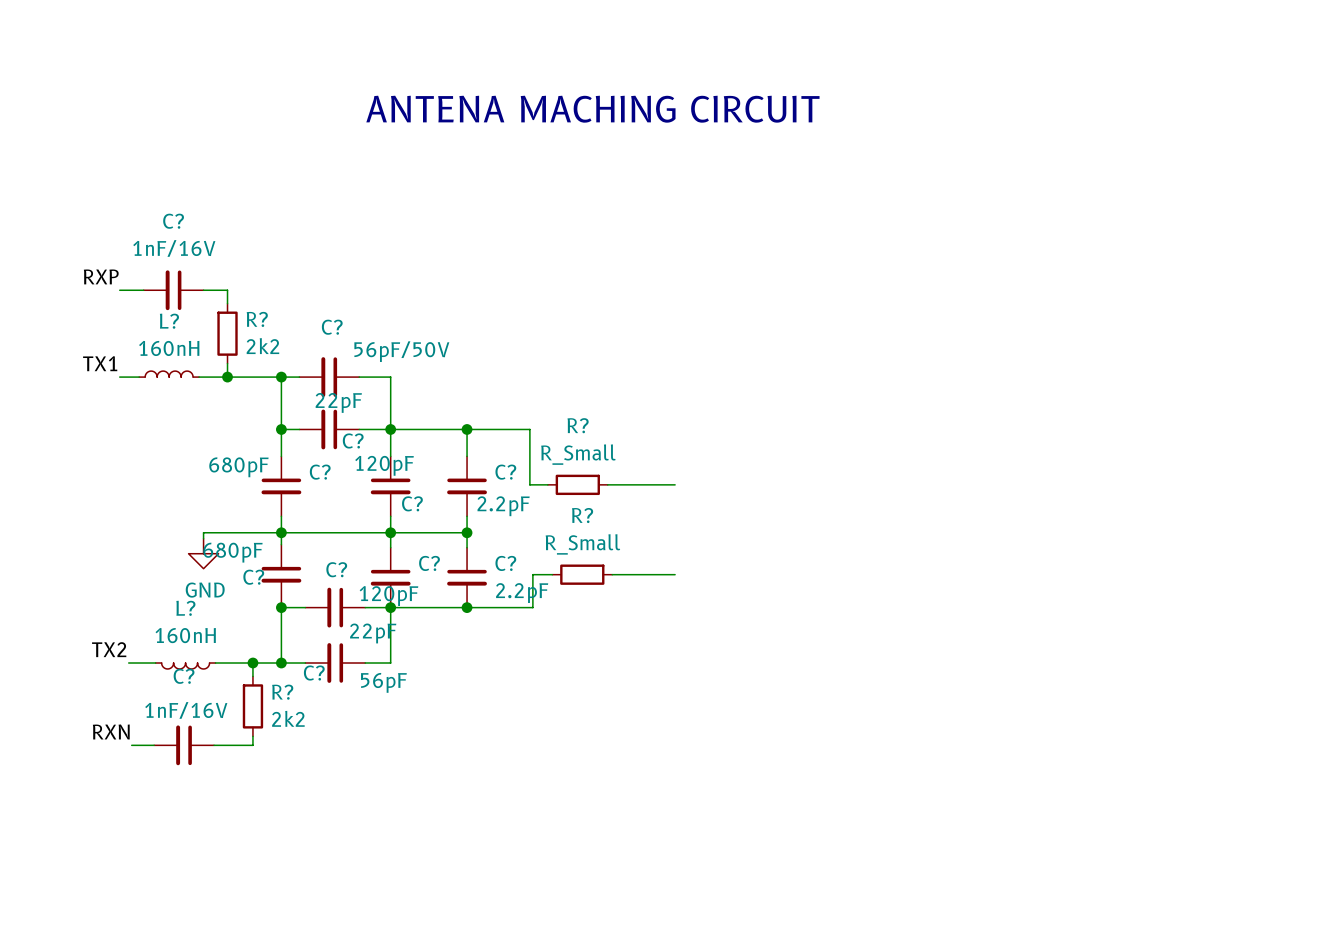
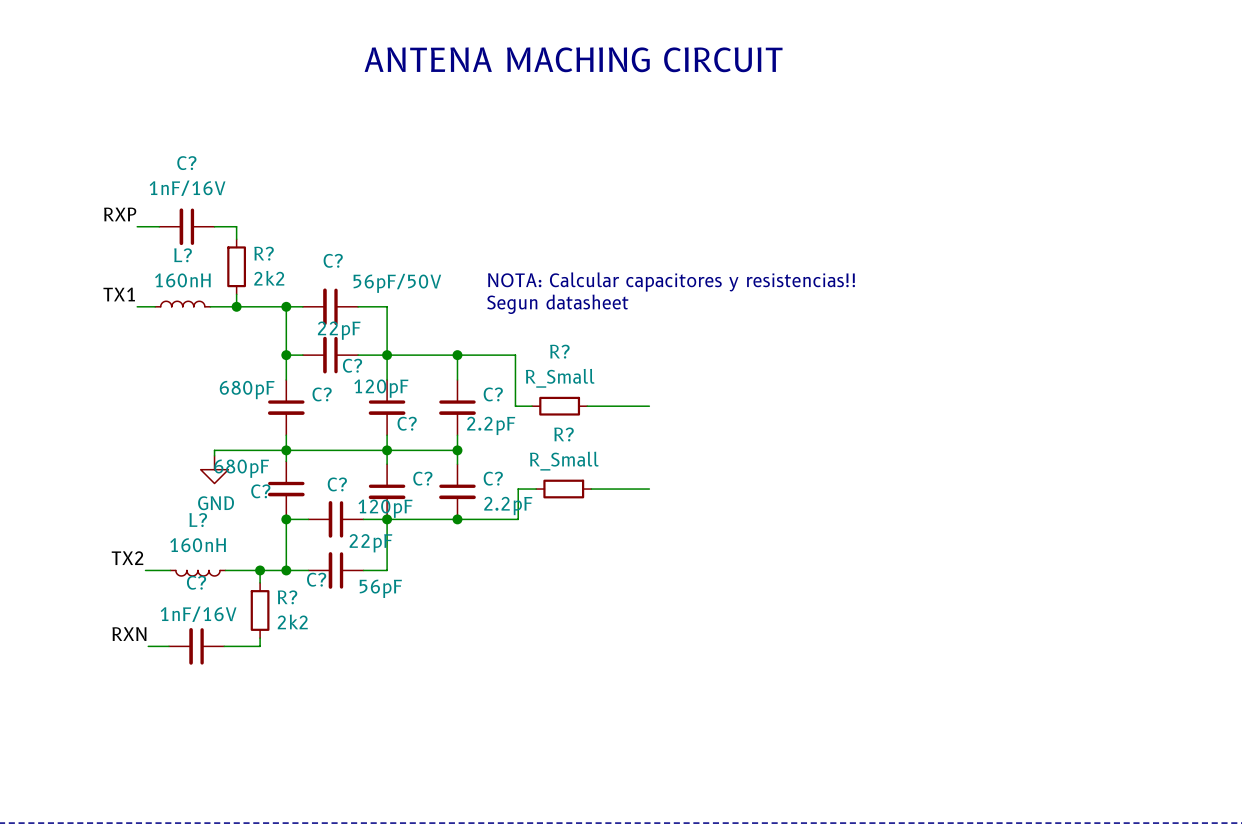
text: none -> NOTA: Calcular capacitores y resistencias!! (671, 281)
text: none -> Segun datasheet (557, 304)

